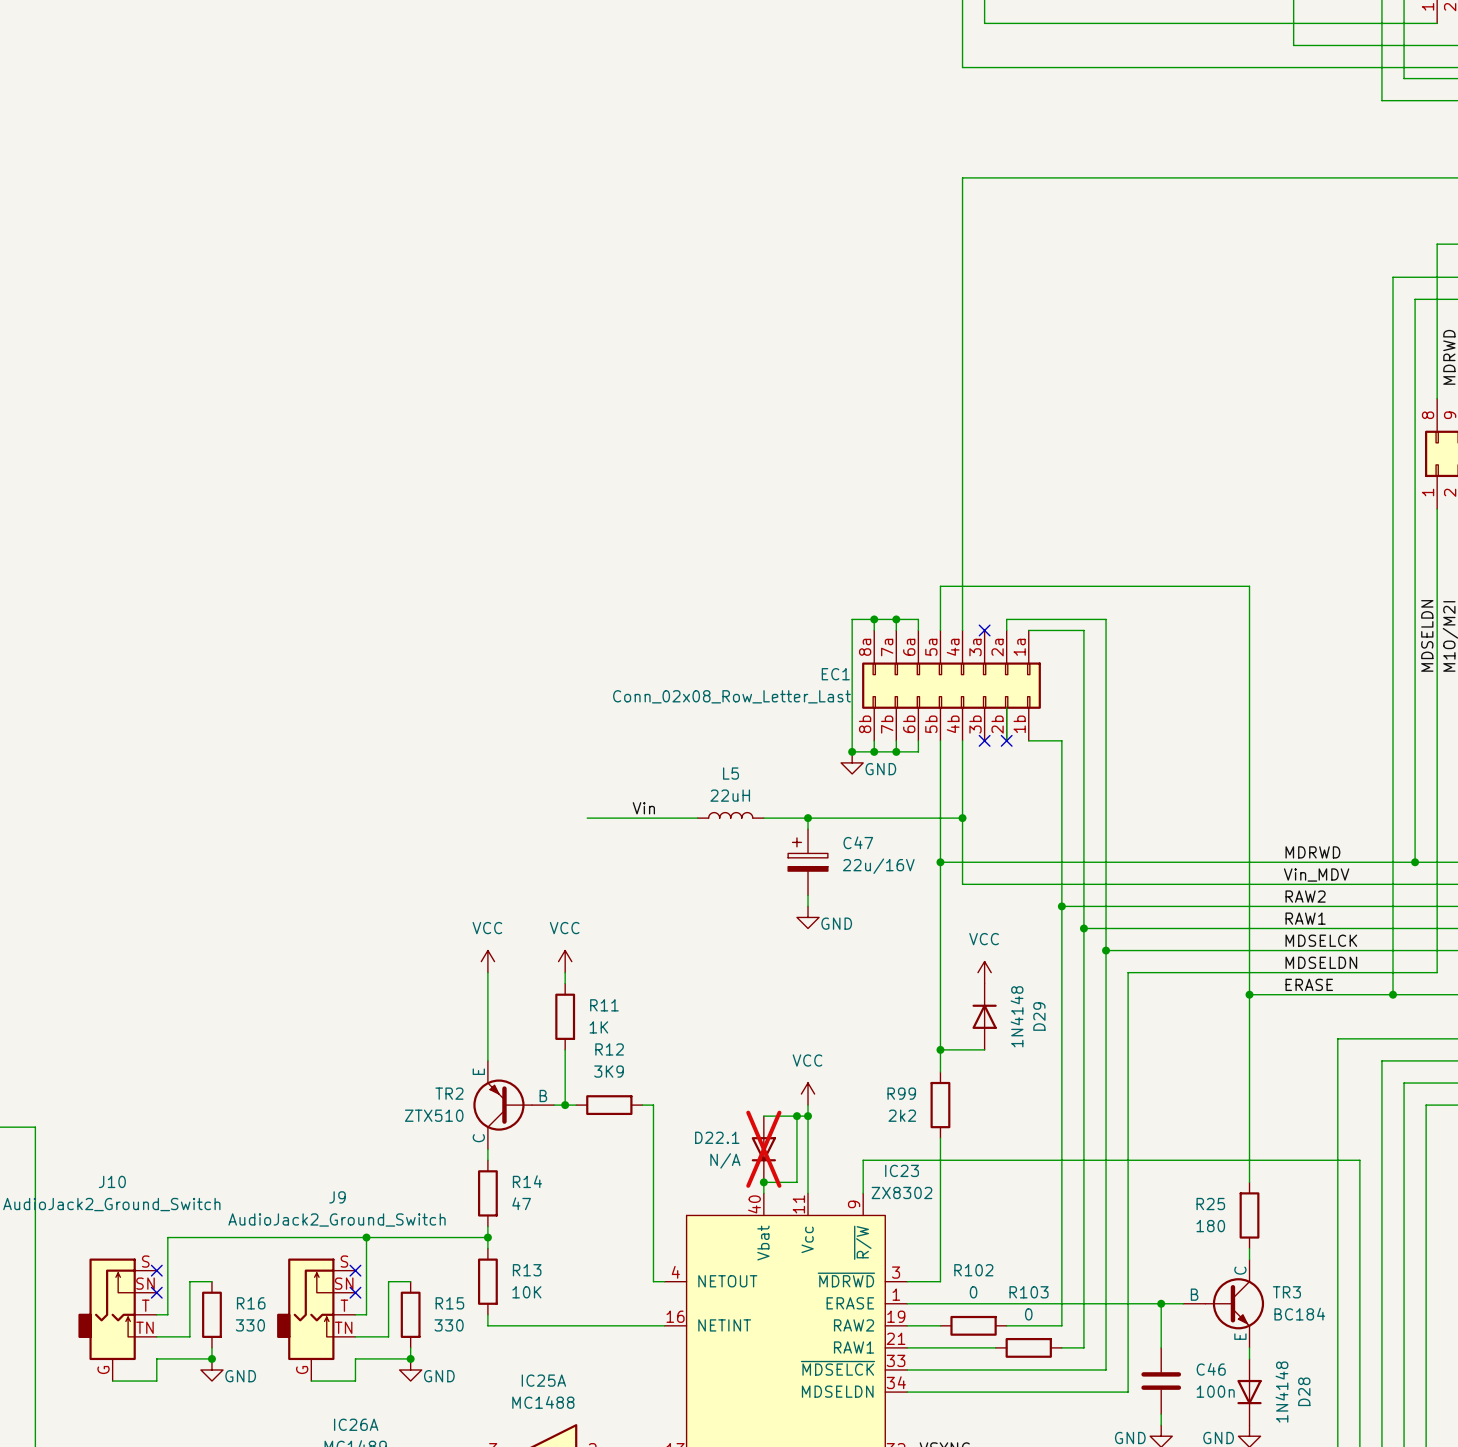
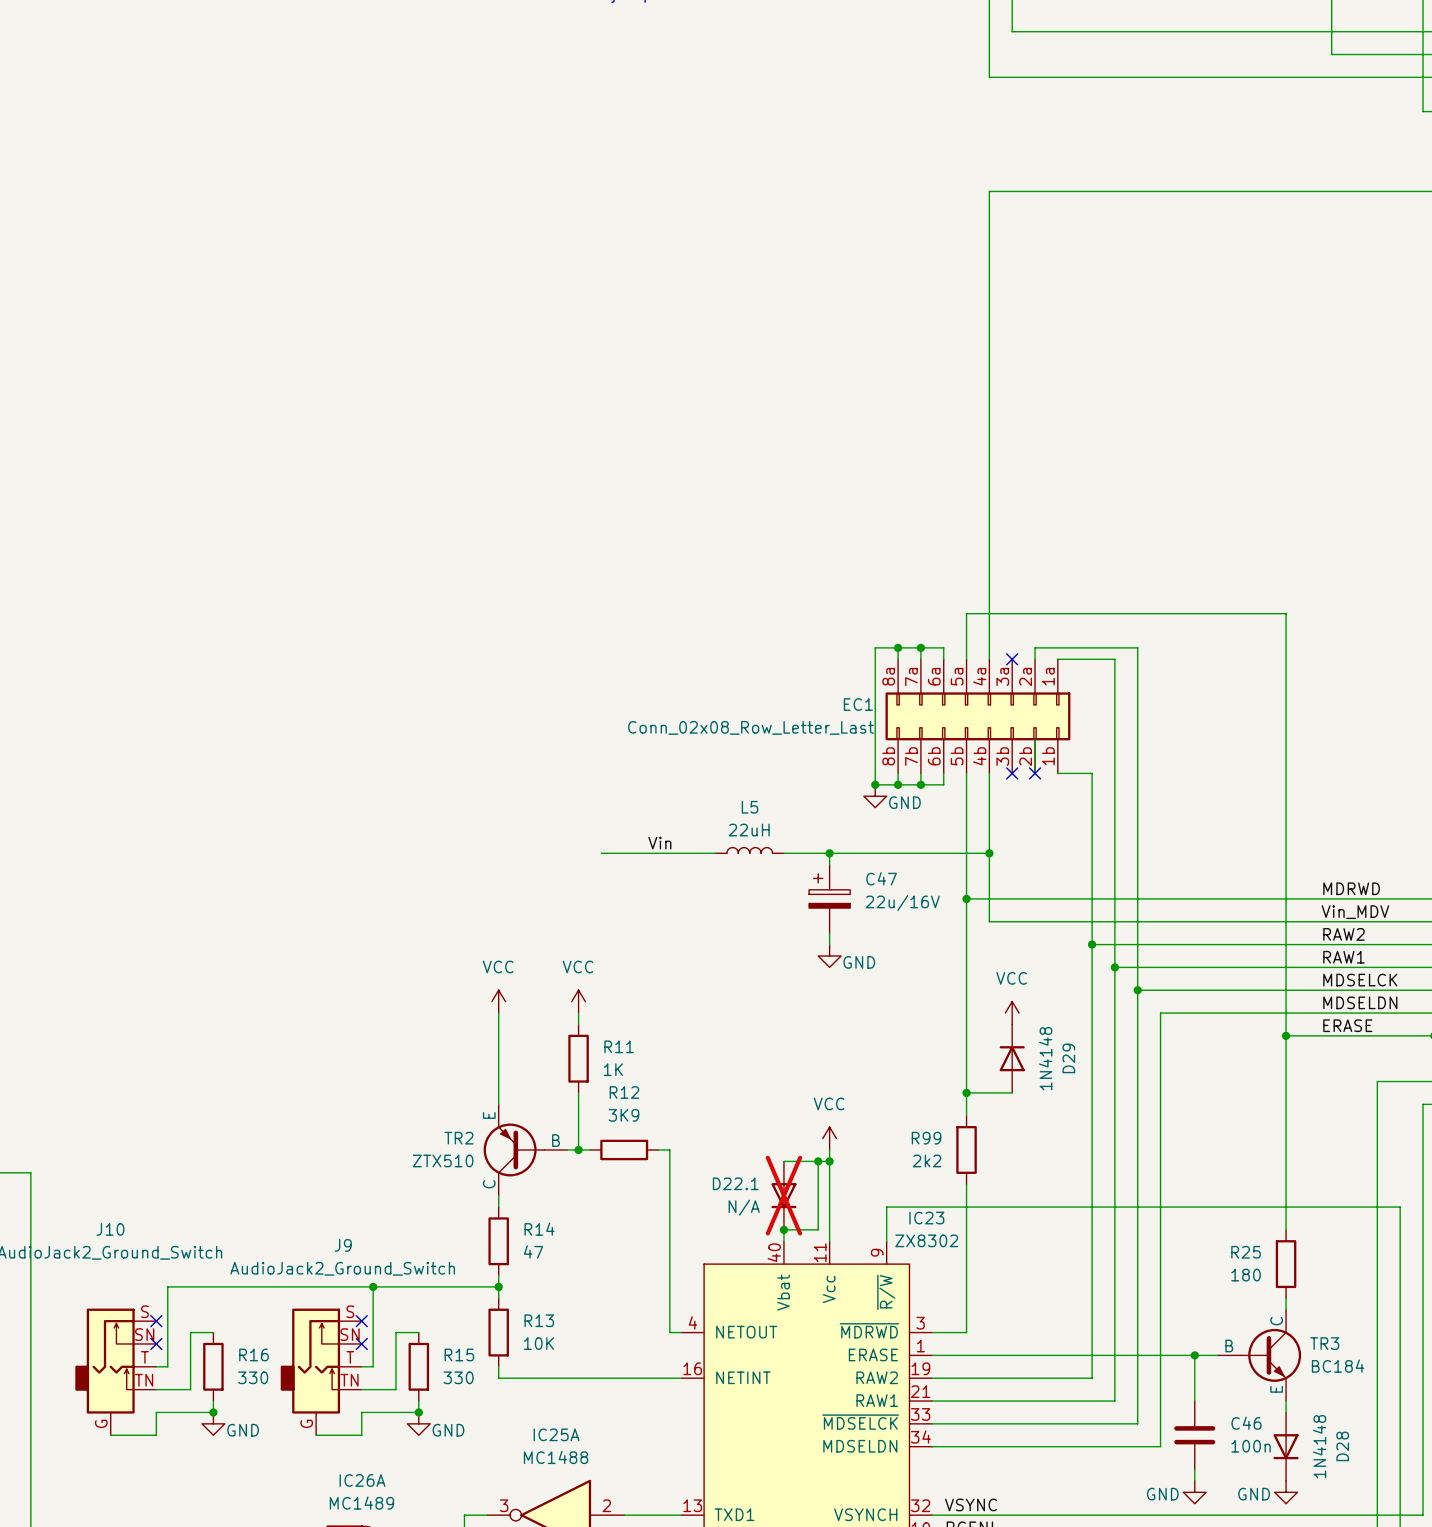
wire: none -> (966, 1378) (1035, 1378)
R102: 0 (973, 1325) -> none
wire: none -> (1023, 1401) (1092, 1401)
R103: 0 (1028, 1347) -> none

